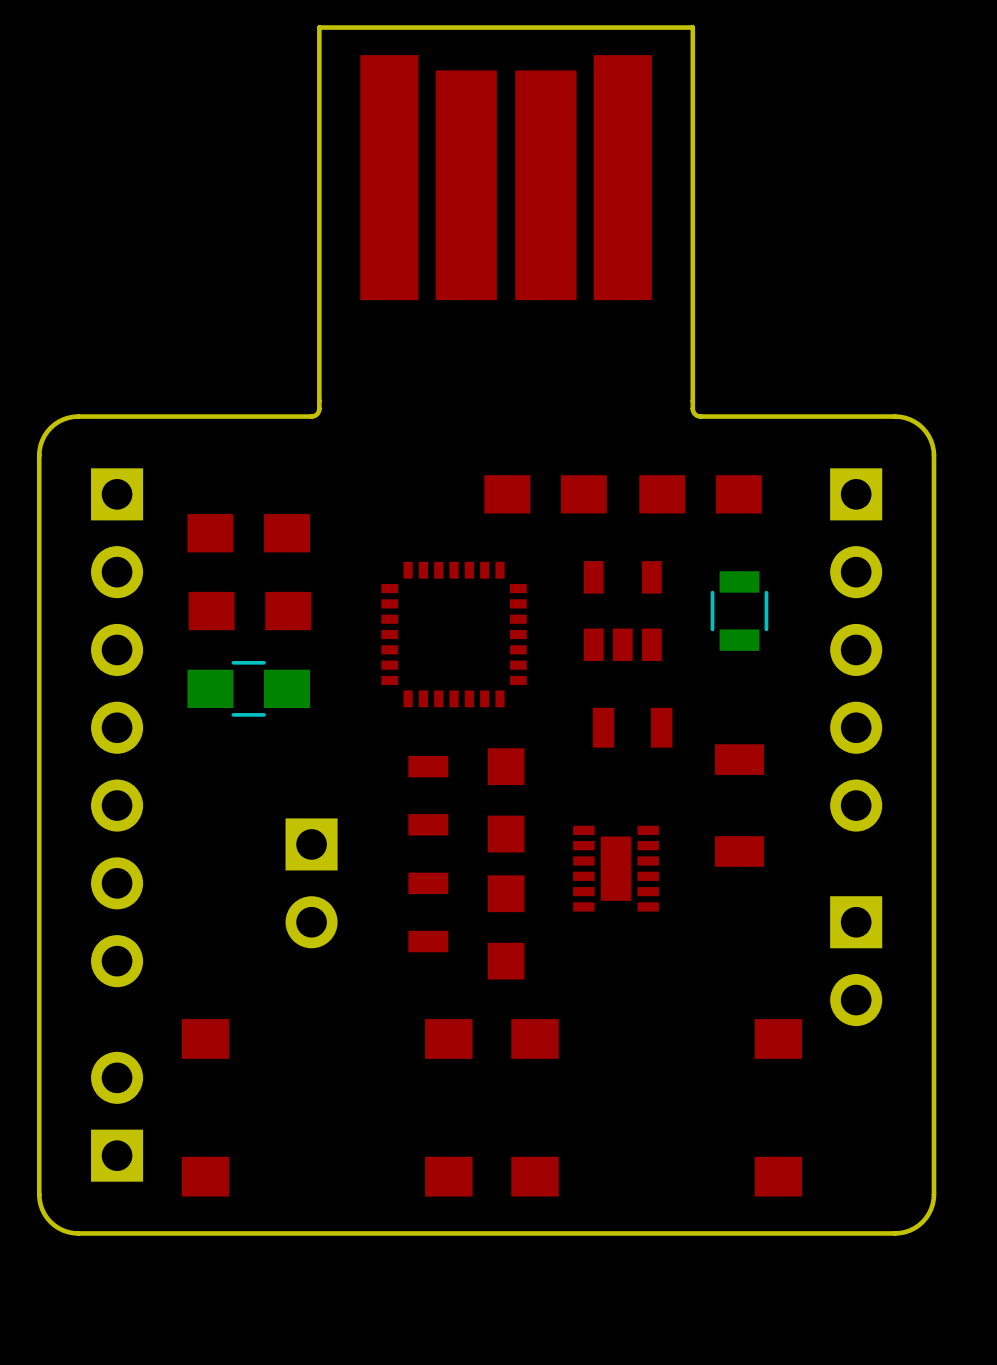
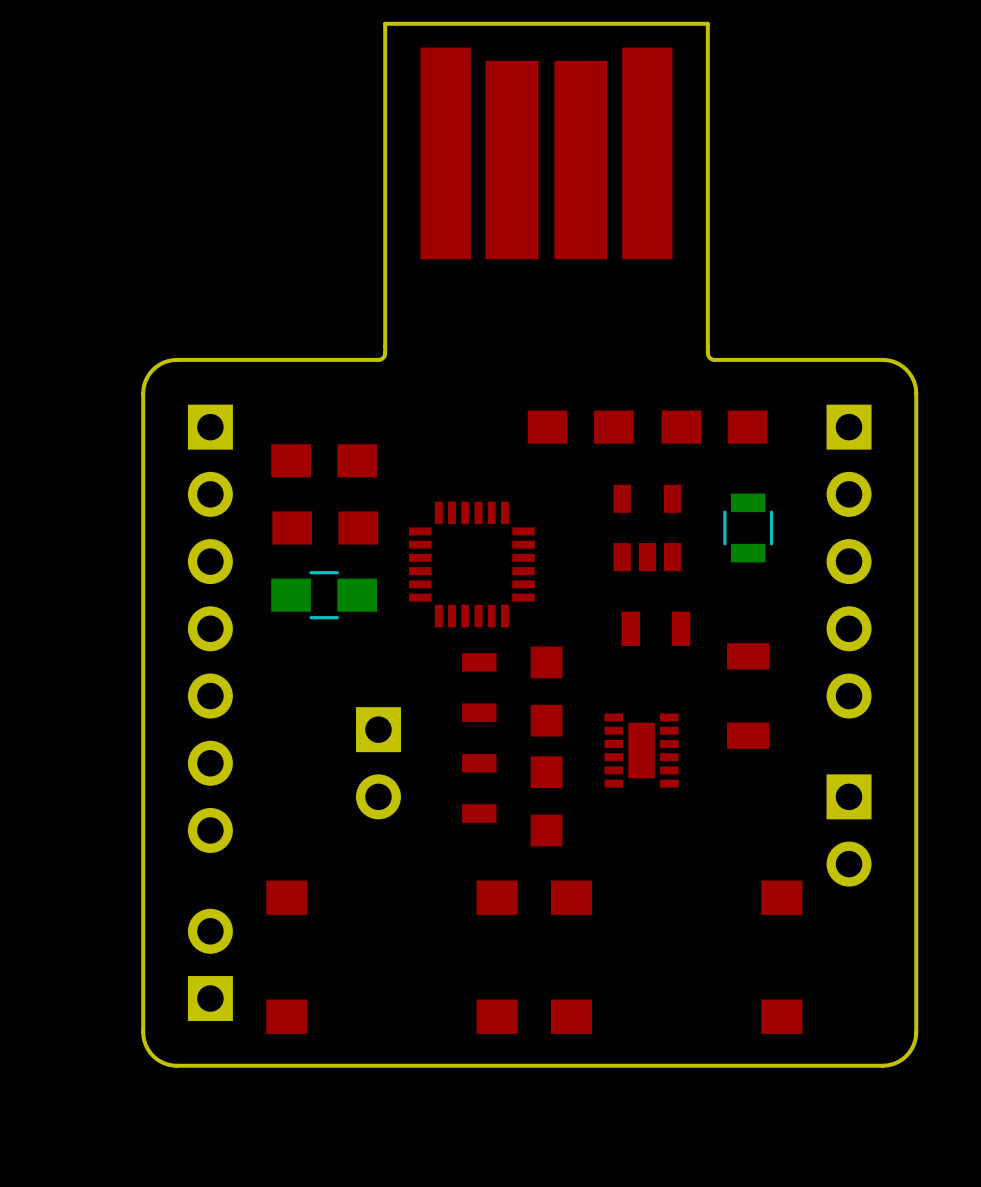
part: (454, 634) -> none
part: none -> (471, 564)

